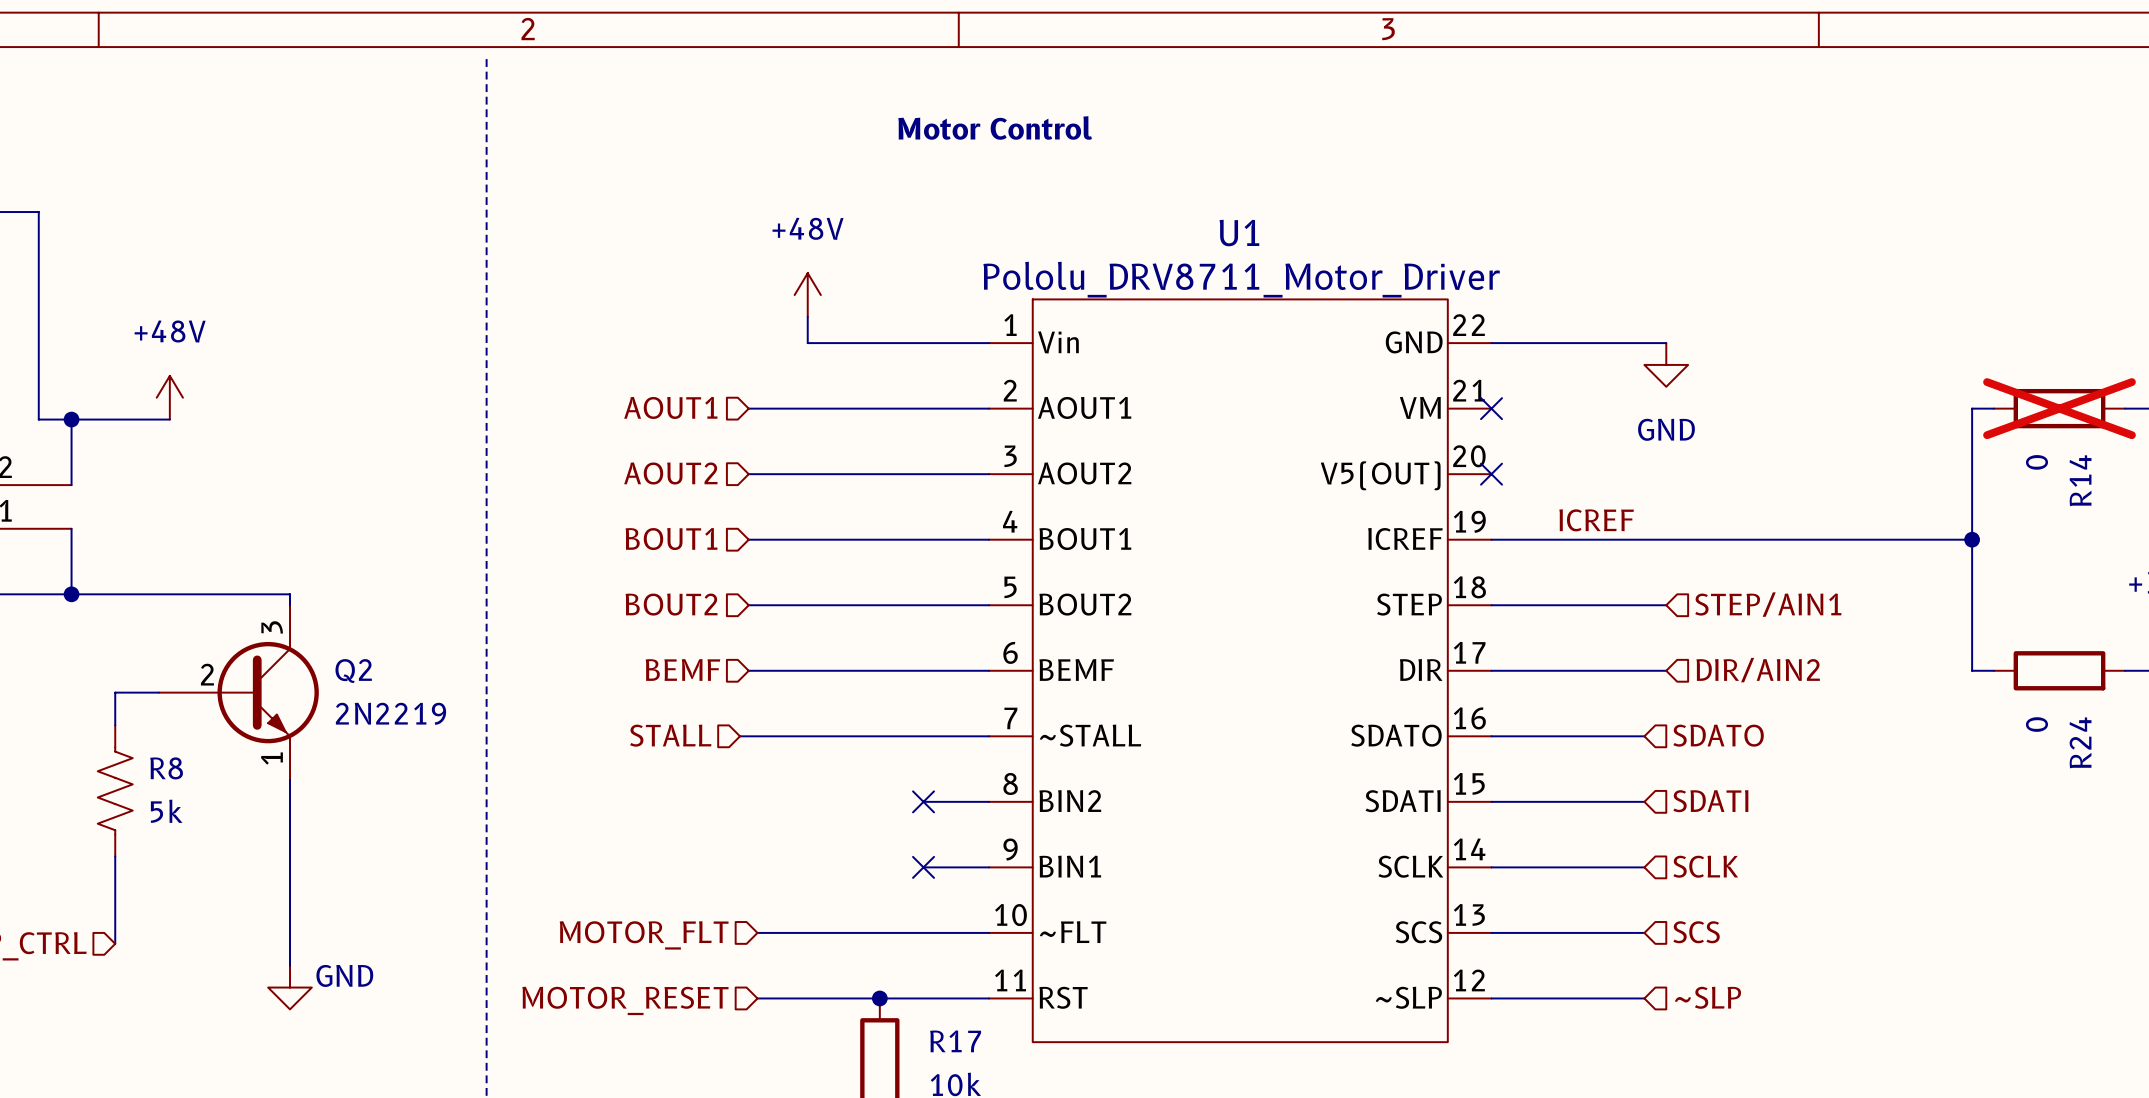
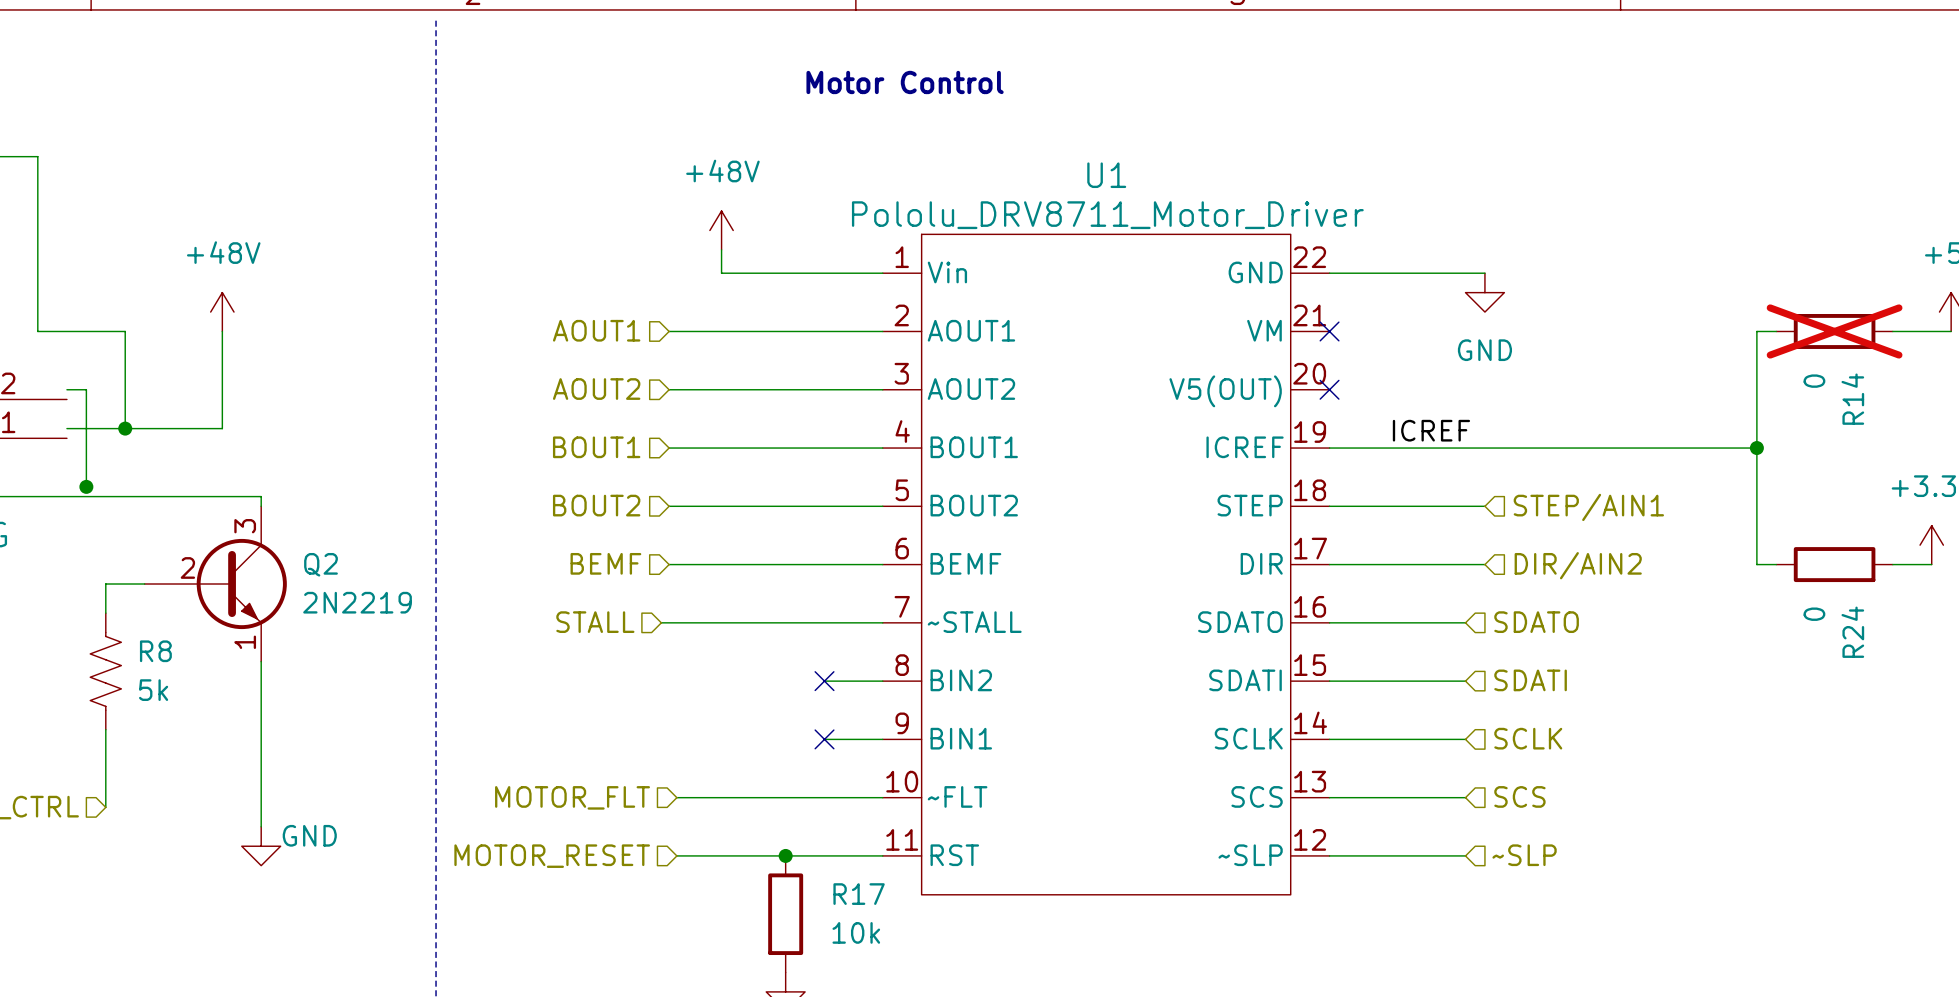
power symbol position: +48V (169, 397) -> +48V (222, 312)
wire: (38, 408) (38, 419) (169, 419) -> (37, 331) (125, 331) (125, 428)
wire: none -> (222, 331) (222, 428) (66, 428)
wire: (71, 419) (71, 485) -> none
junction: (71, 419) -> none
wire: none -> (66, 389) (86, 389) (86, 486)
junction: none -> (125, 428)
wire: (71, 528) (71, 594) -> none
junction position: (71, 594) -> (86, 486)

